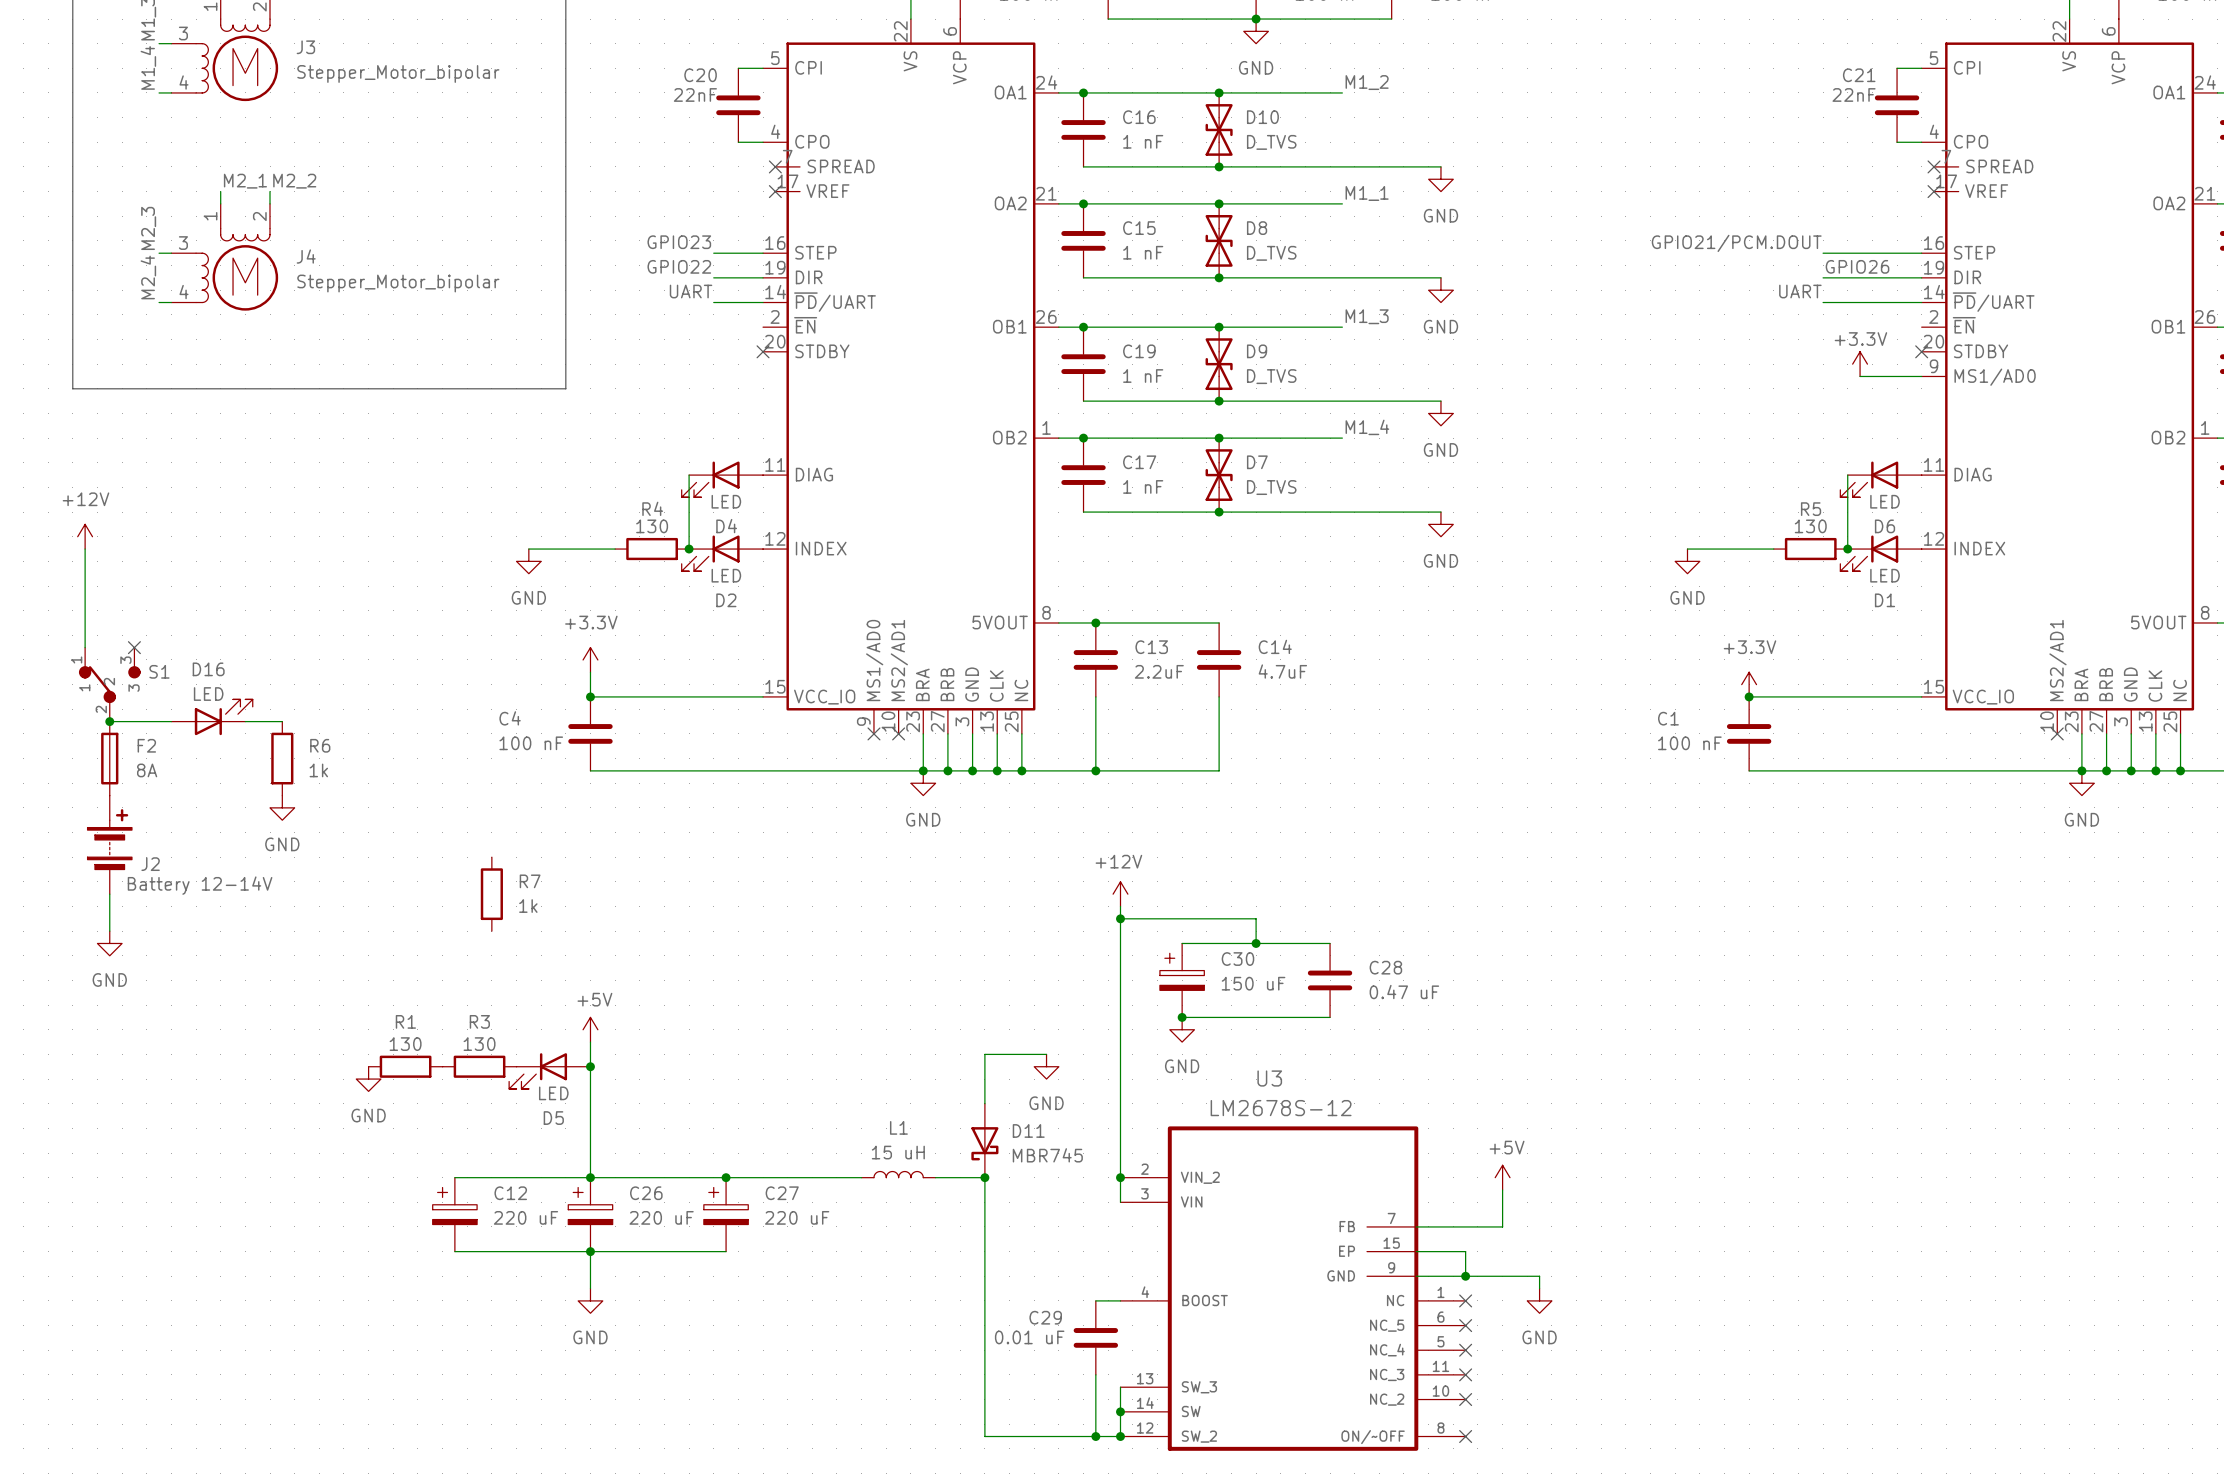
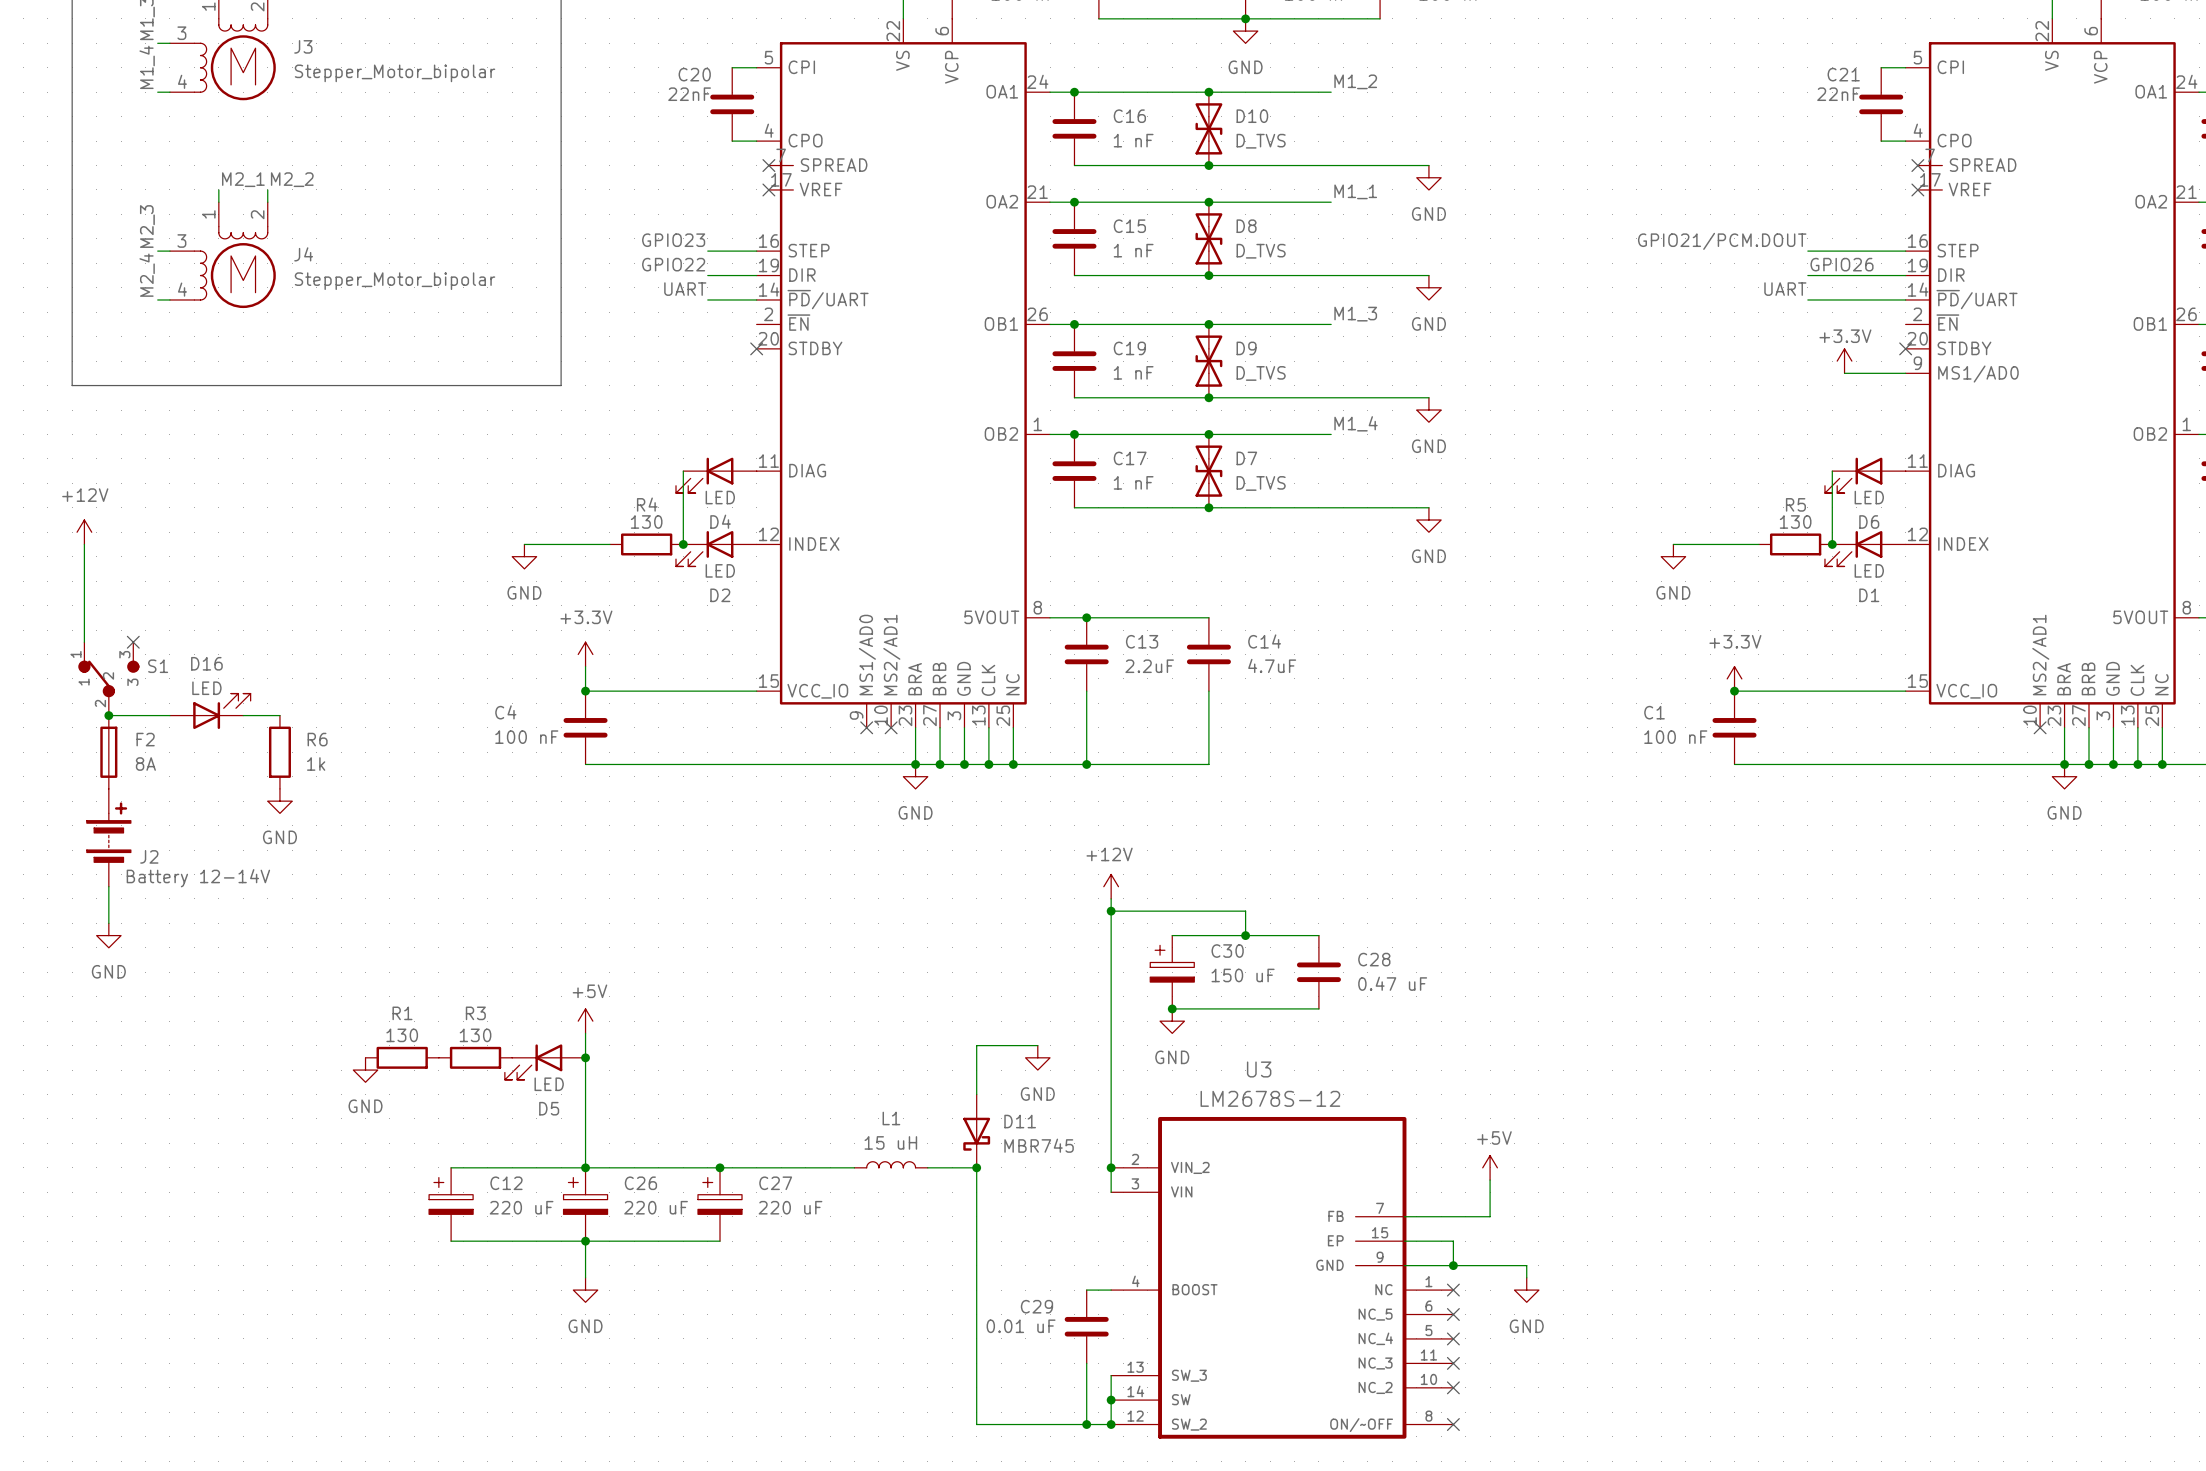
R7: 1k (491, 894) -> none

